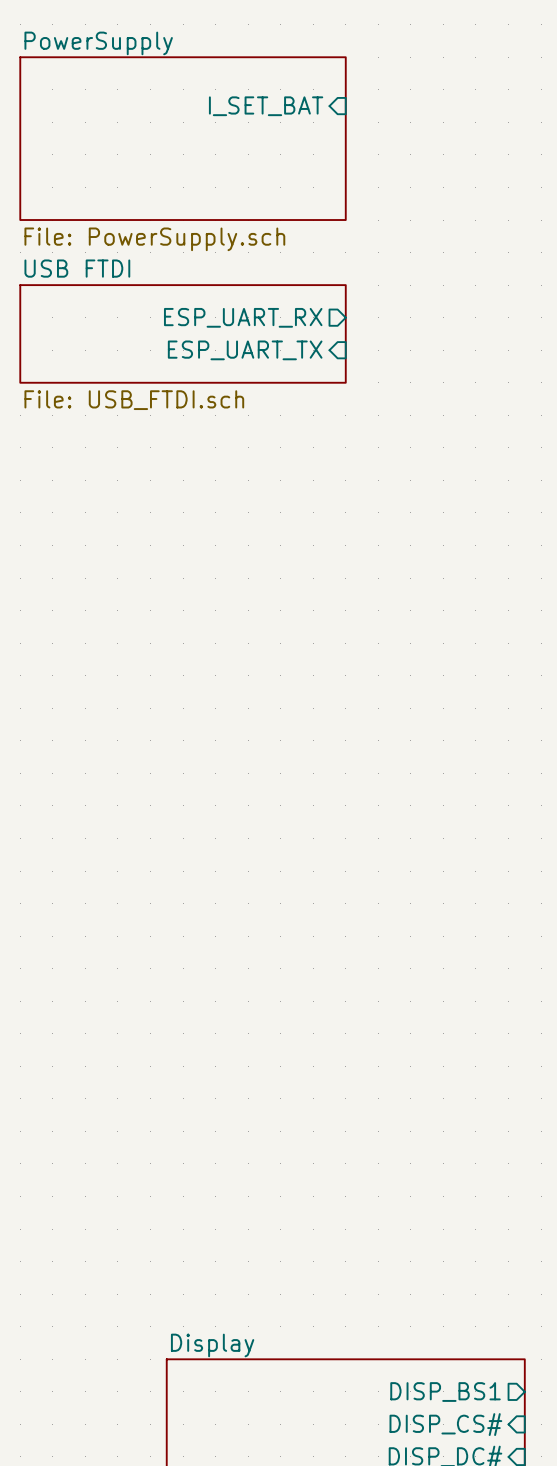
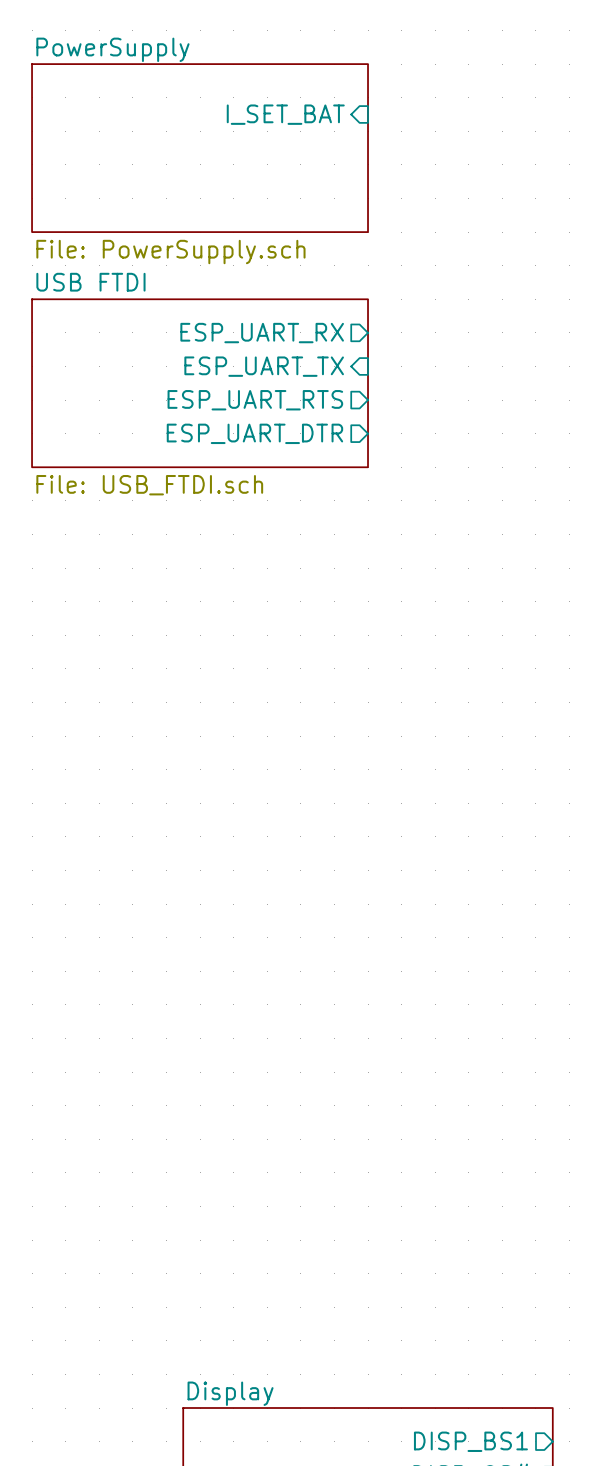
sheet USB FTDI: File: USB_FTDI.sch (183, 333) -> none
sheet USB FTDI: none -> File: USB_FTDI.sch (200, 383)
sheet pin: none -> ESP_UART_RTS (255, 400)
sheet pin: none -> ESP_UART_DTR (254, 433)

